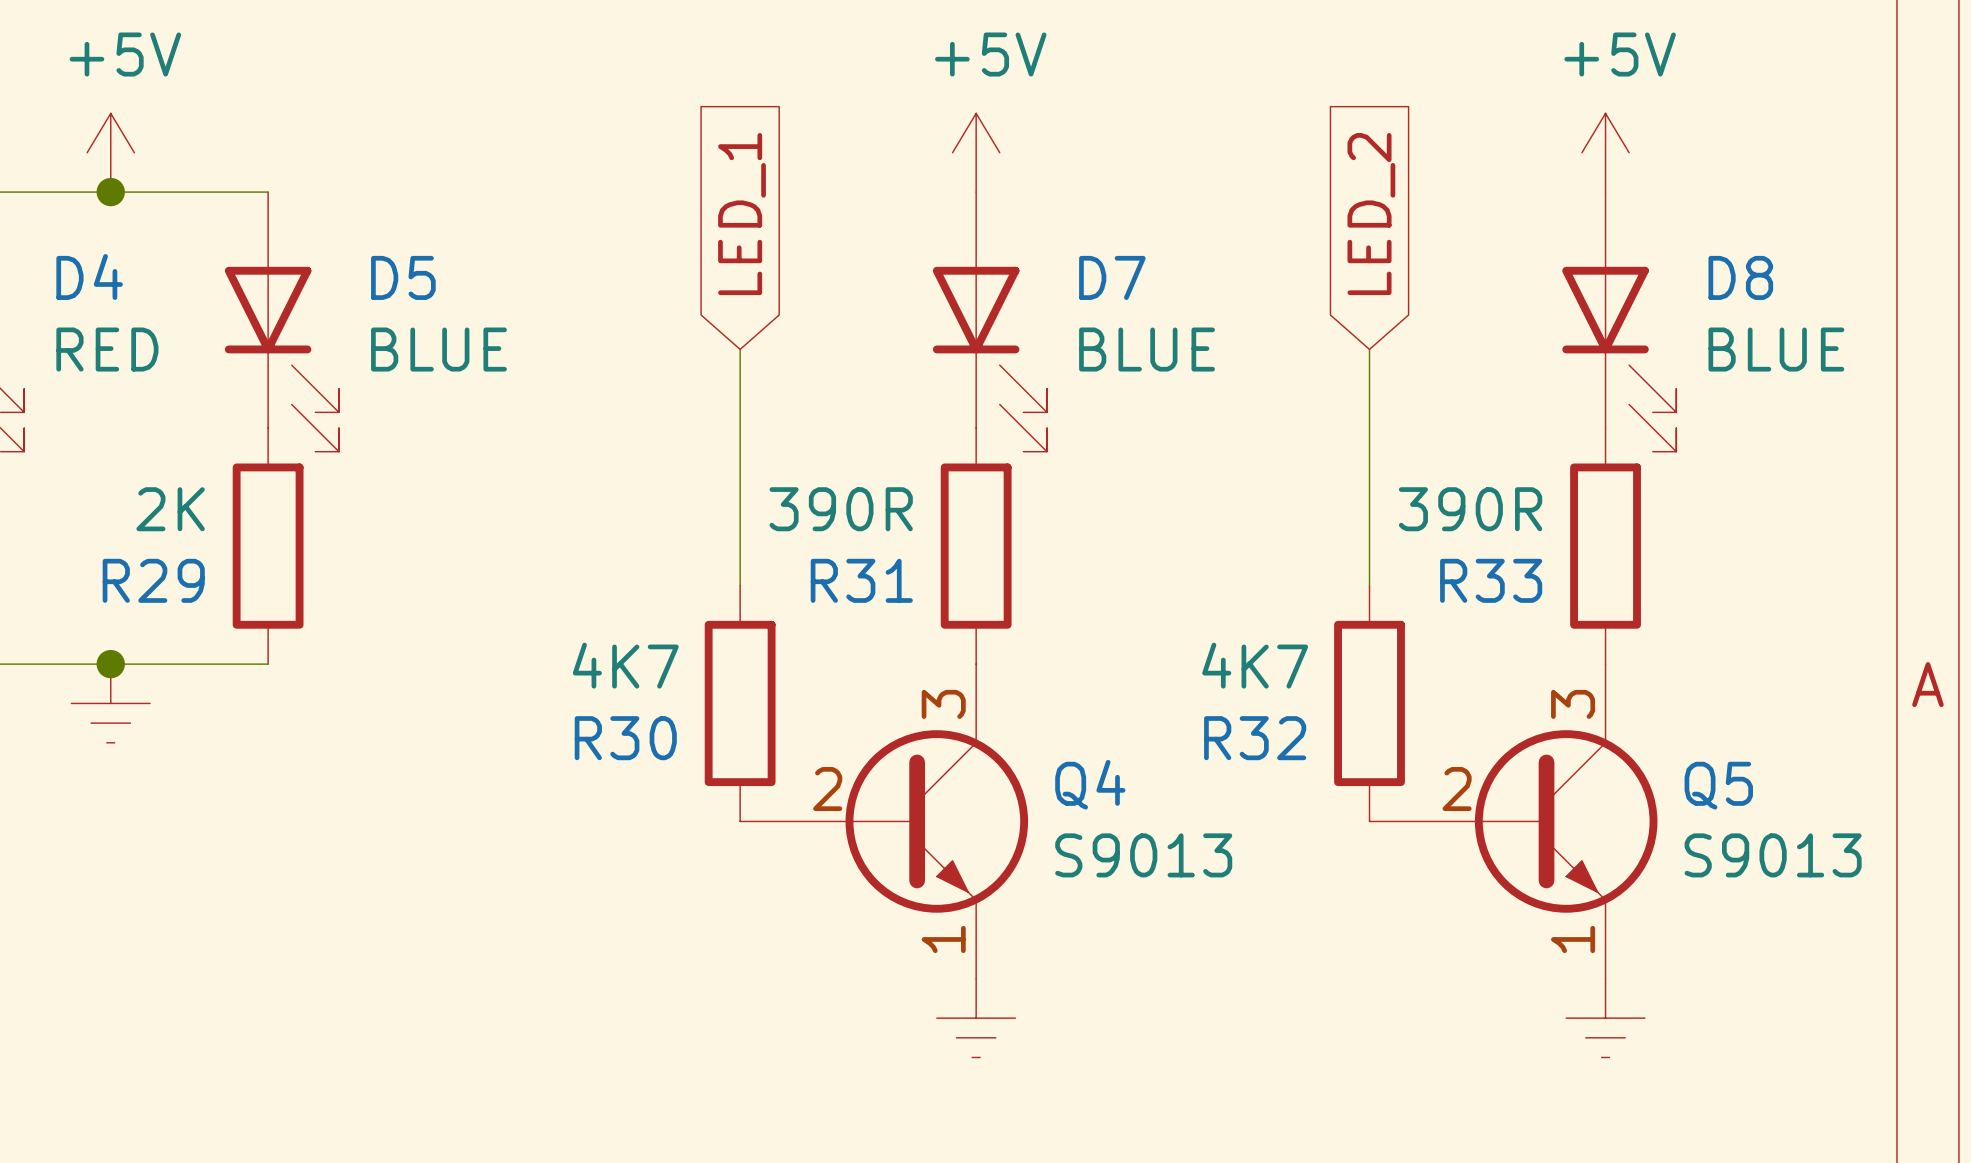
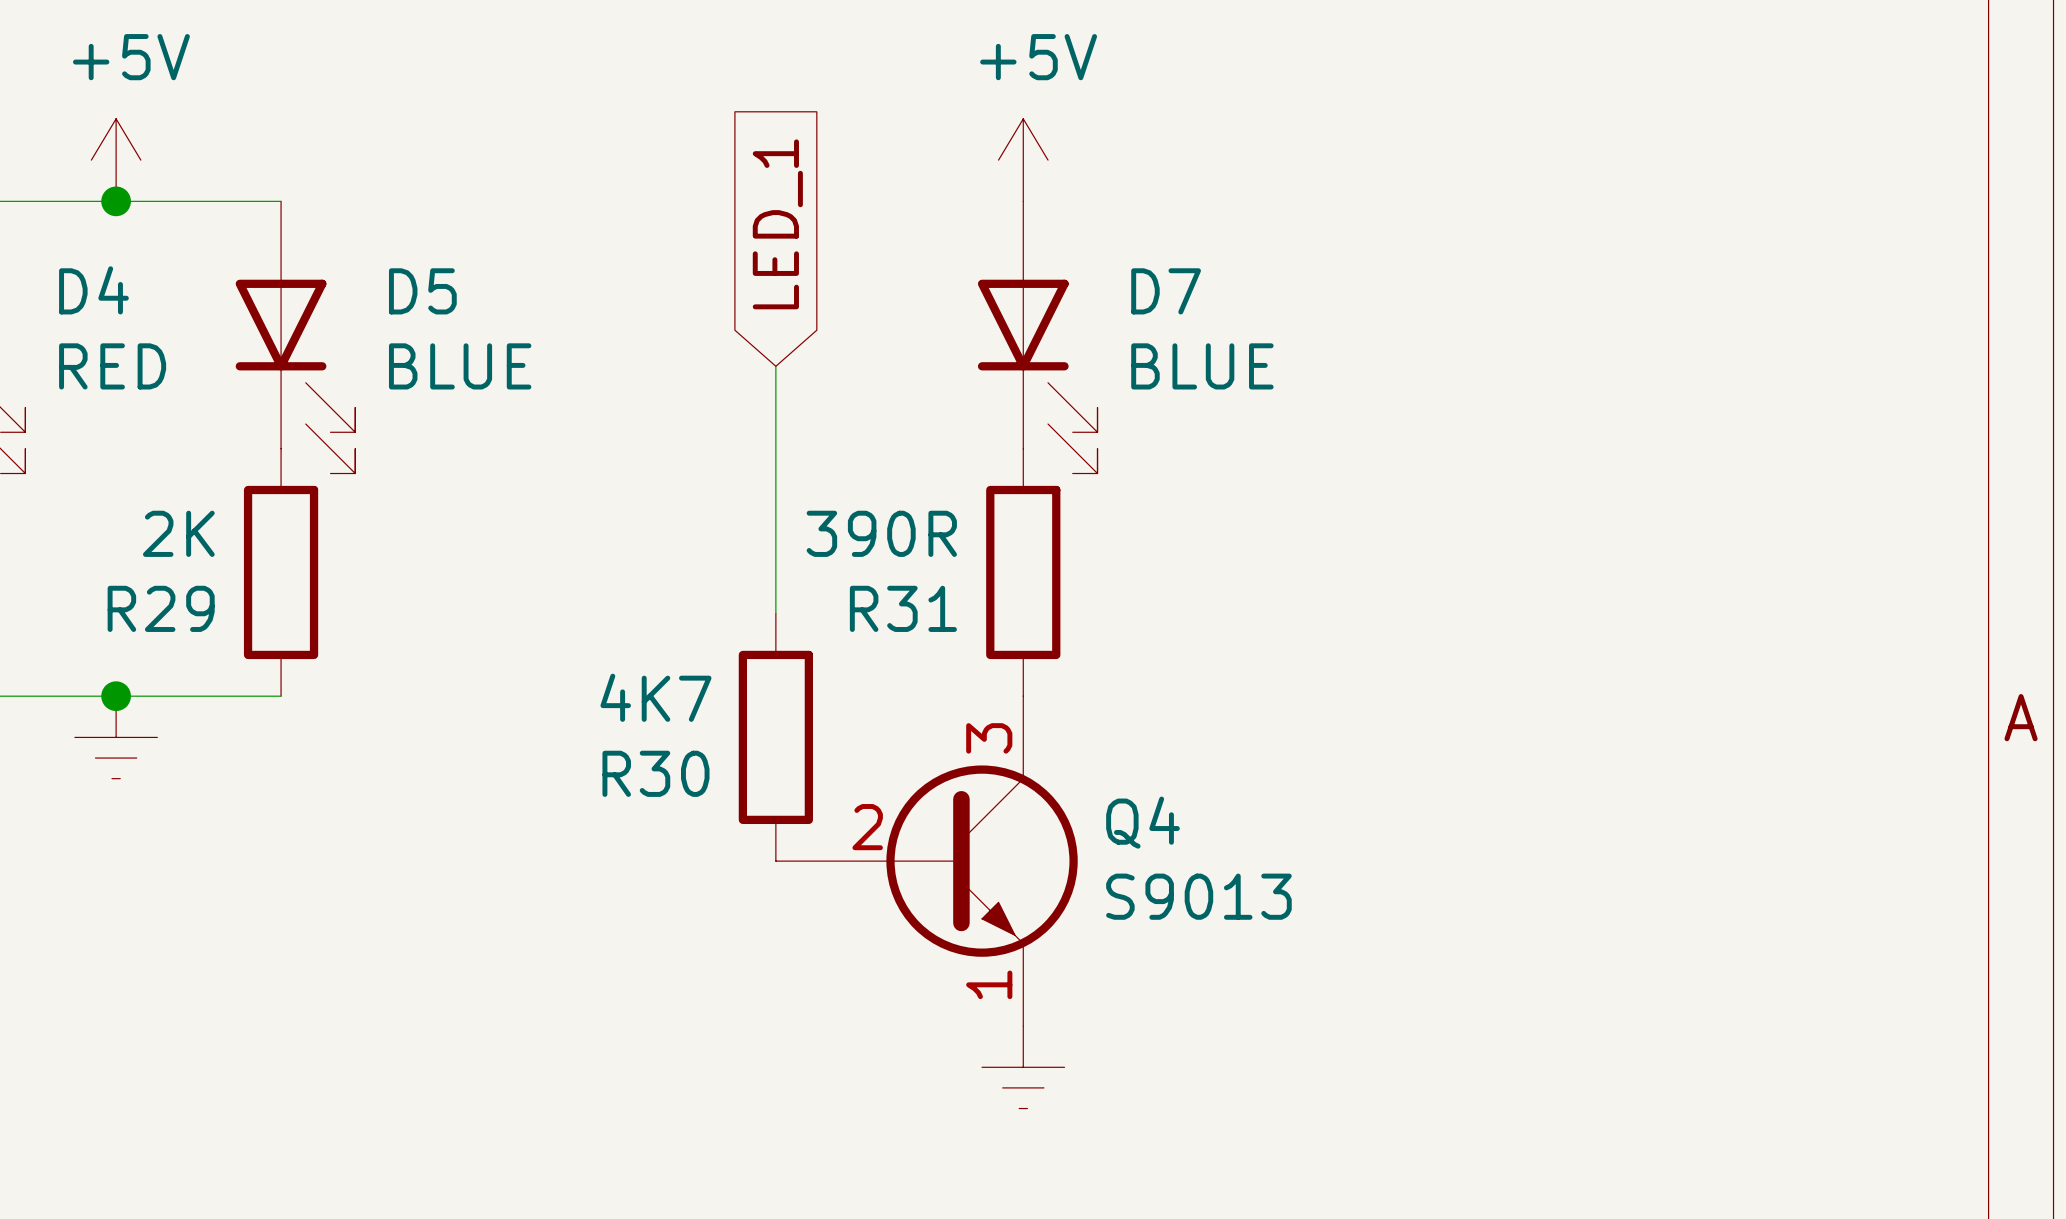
power symbol: +5V (1605, 152) -> none
global label: LED_2 (1371, 214) -> none
D8: BLUE (1619, 321) -> none
wire: (1369, 349) (1369, 585) -> none
R33: 390R (1605, 546) -> none
R32: 4K7 (1369, 703) -> none
Q5: S9013 (1513, 821) -> none
power symbol: (1605, 1018) -> none

